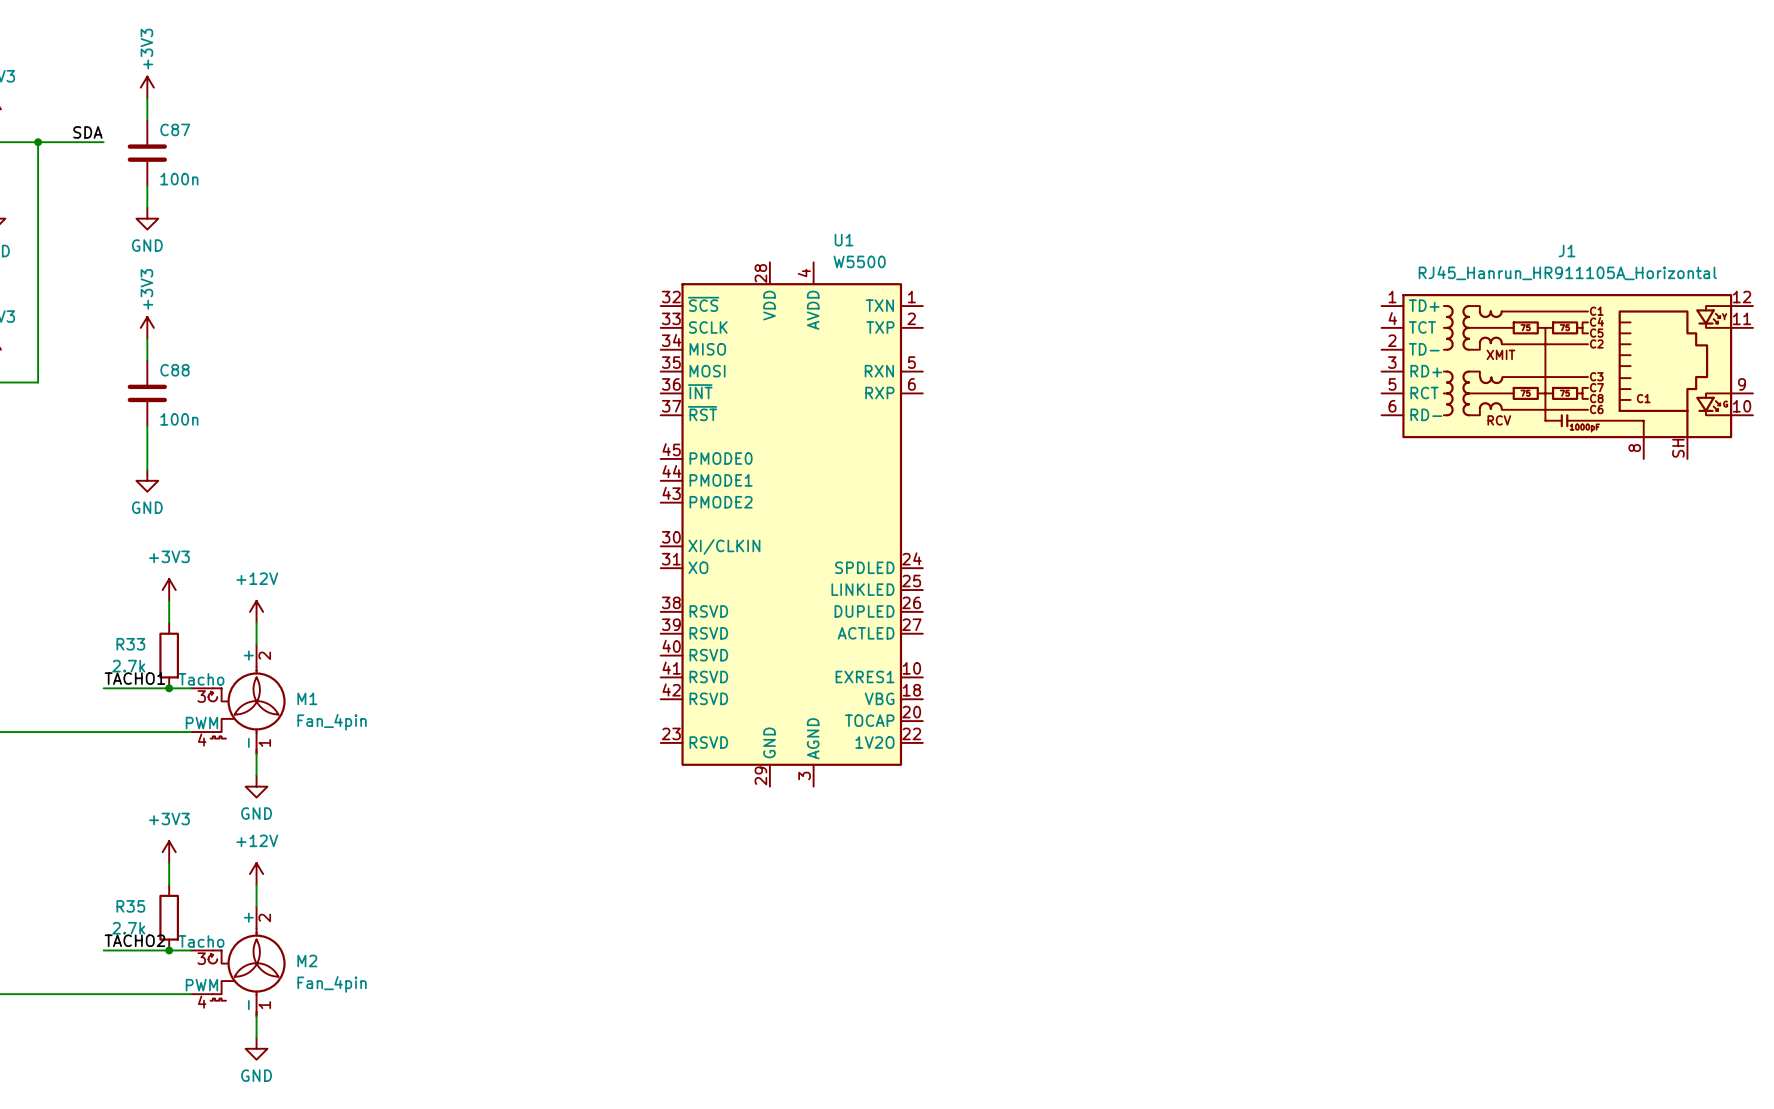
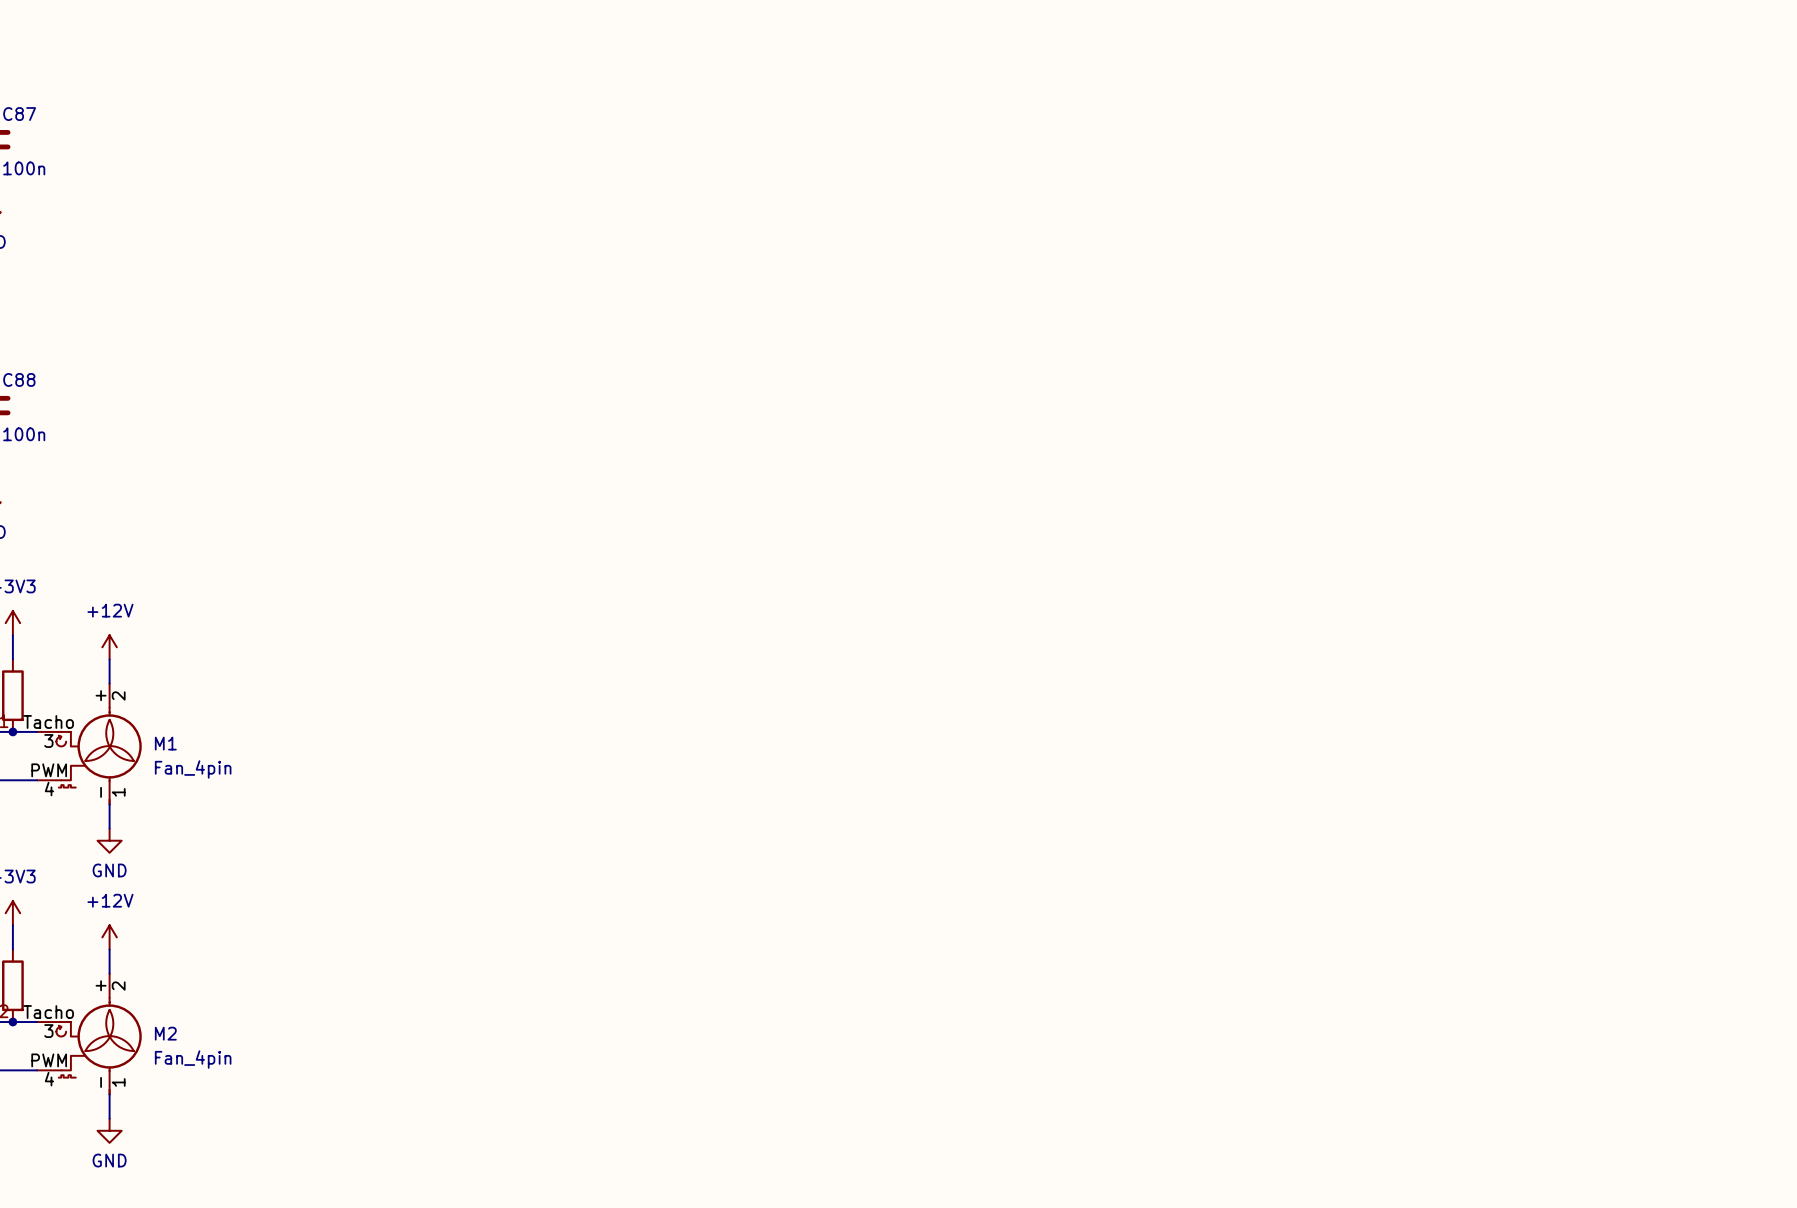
J1: RJ45_Hanrun_HR911105A_Horizontal (1567, 376) -> none
U1: W5500 (791, 524) -> none

